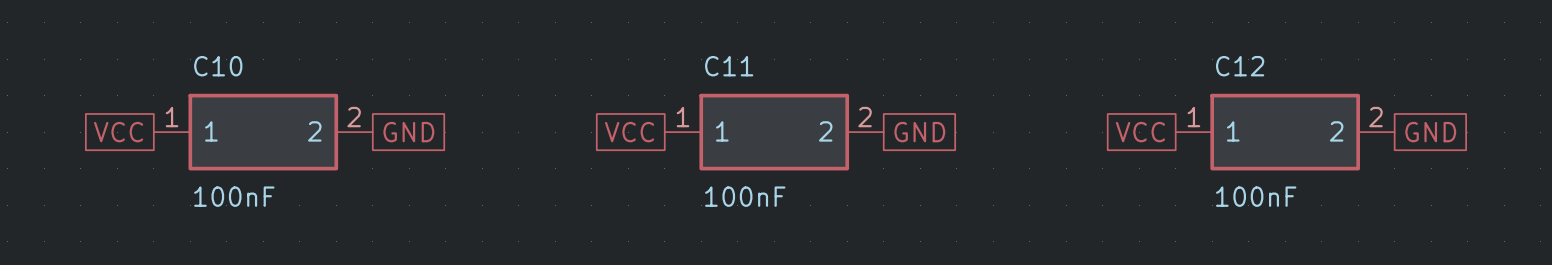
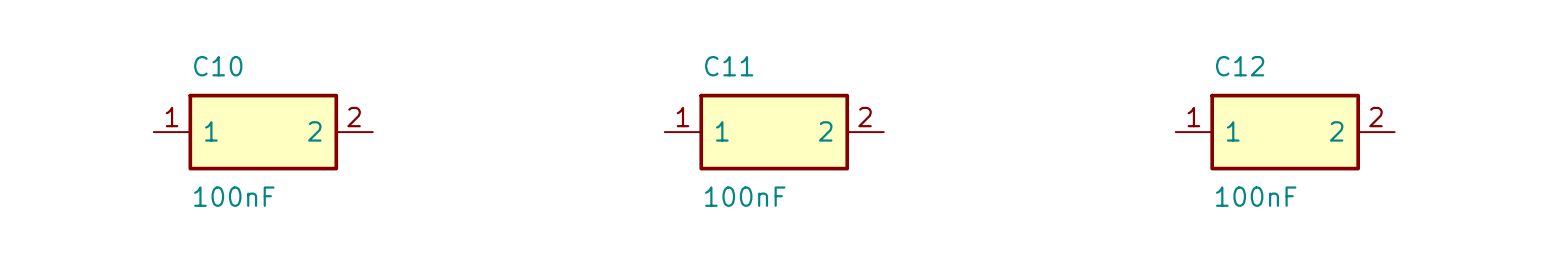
global label: VCC (118, 132) -> none
global label: GND (408, 132) -> none
global label: VCC (629, 132) -> none
global label: GND (919, 132) -> none
global label: VCC (1140, 132) -> none
global label: GND (1430, 132) -> none

